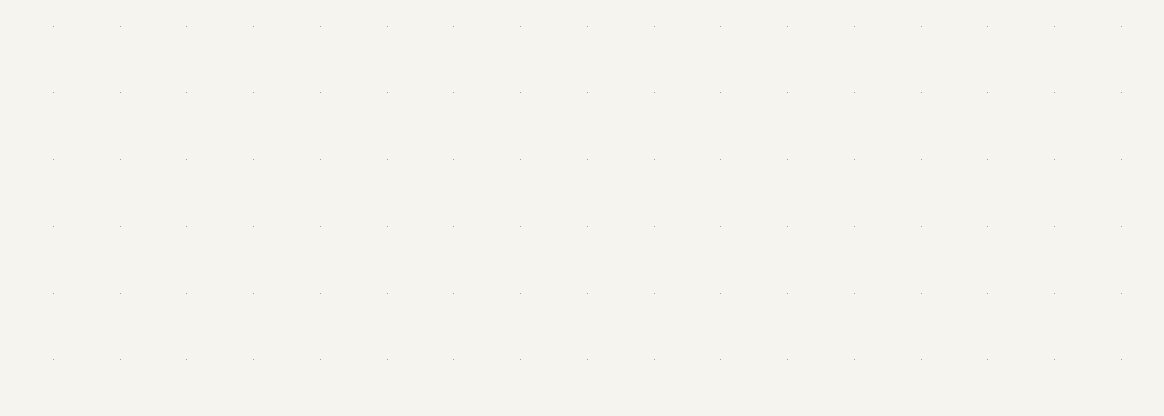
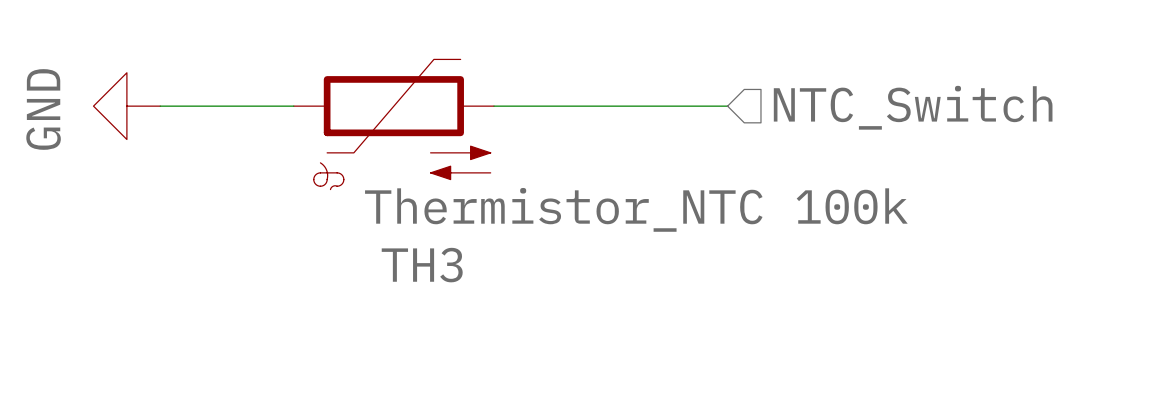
power symbol: none -> GND (126, 106)
wire: none -> (160, 106) (293, 106)
wire: none -> (494, 106) (727, 106)
hierarchical label: none -> NTC_Switch (913, 107)
TH3: none -> Thermistor_NTC 100k (393, 124)

